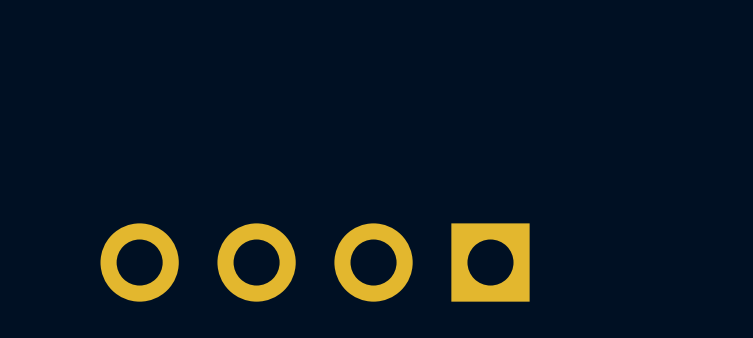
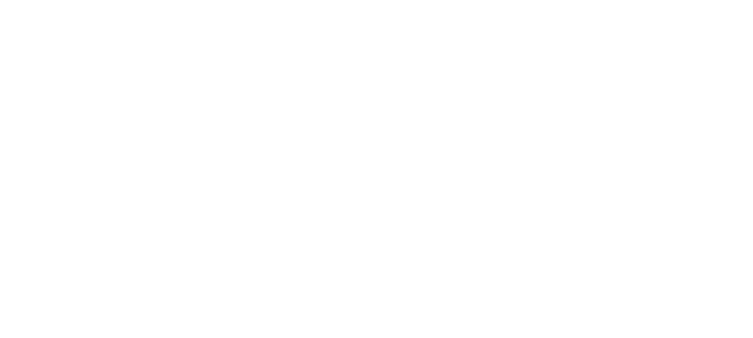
part: (315, 262) -> none

